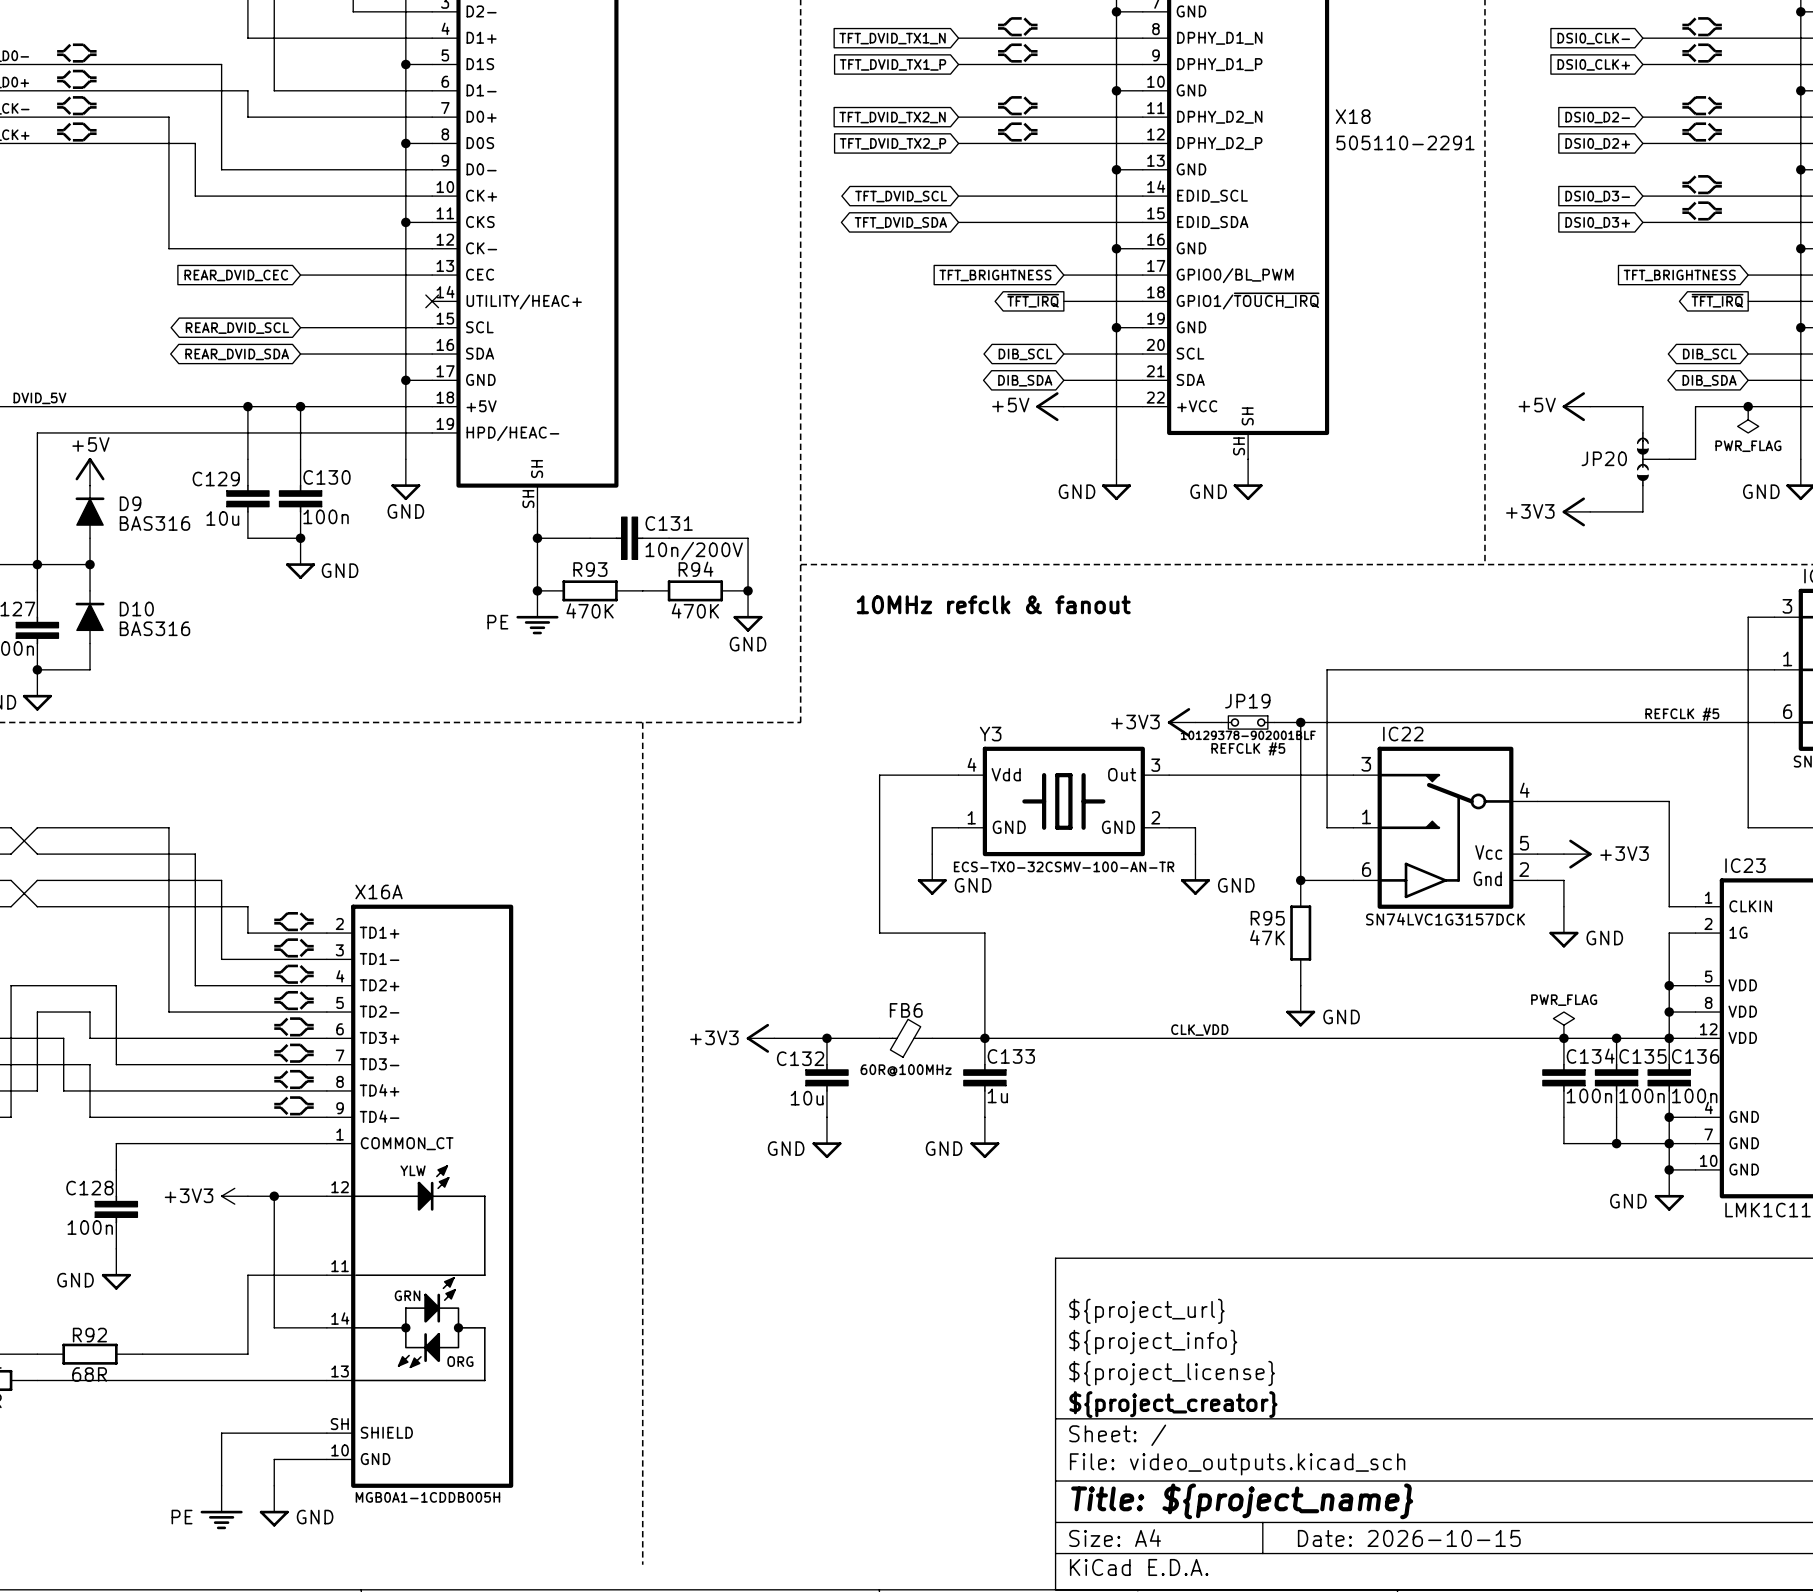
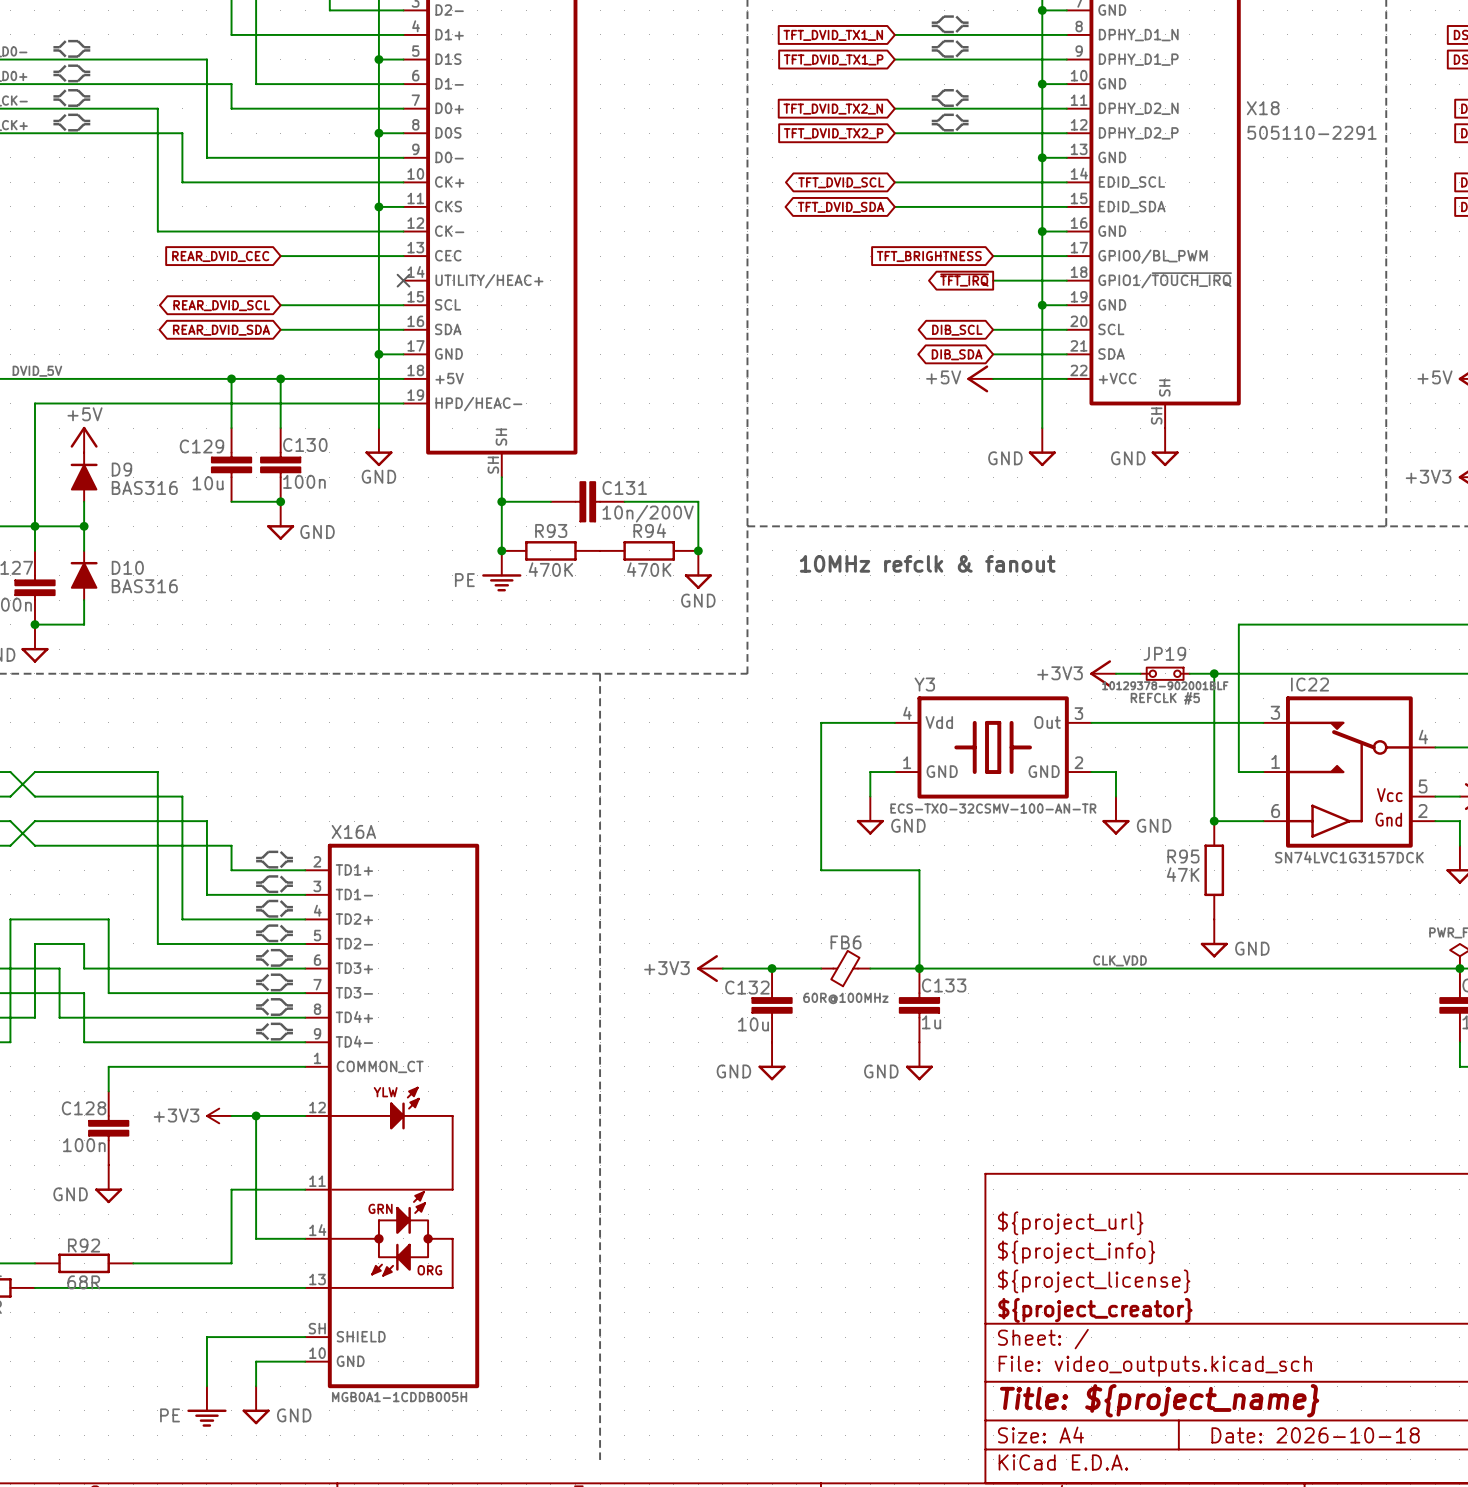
title block: Date: 2026-10-15 (1409, 1538) -> Date: 2026-10-18 (1315, 1435)

